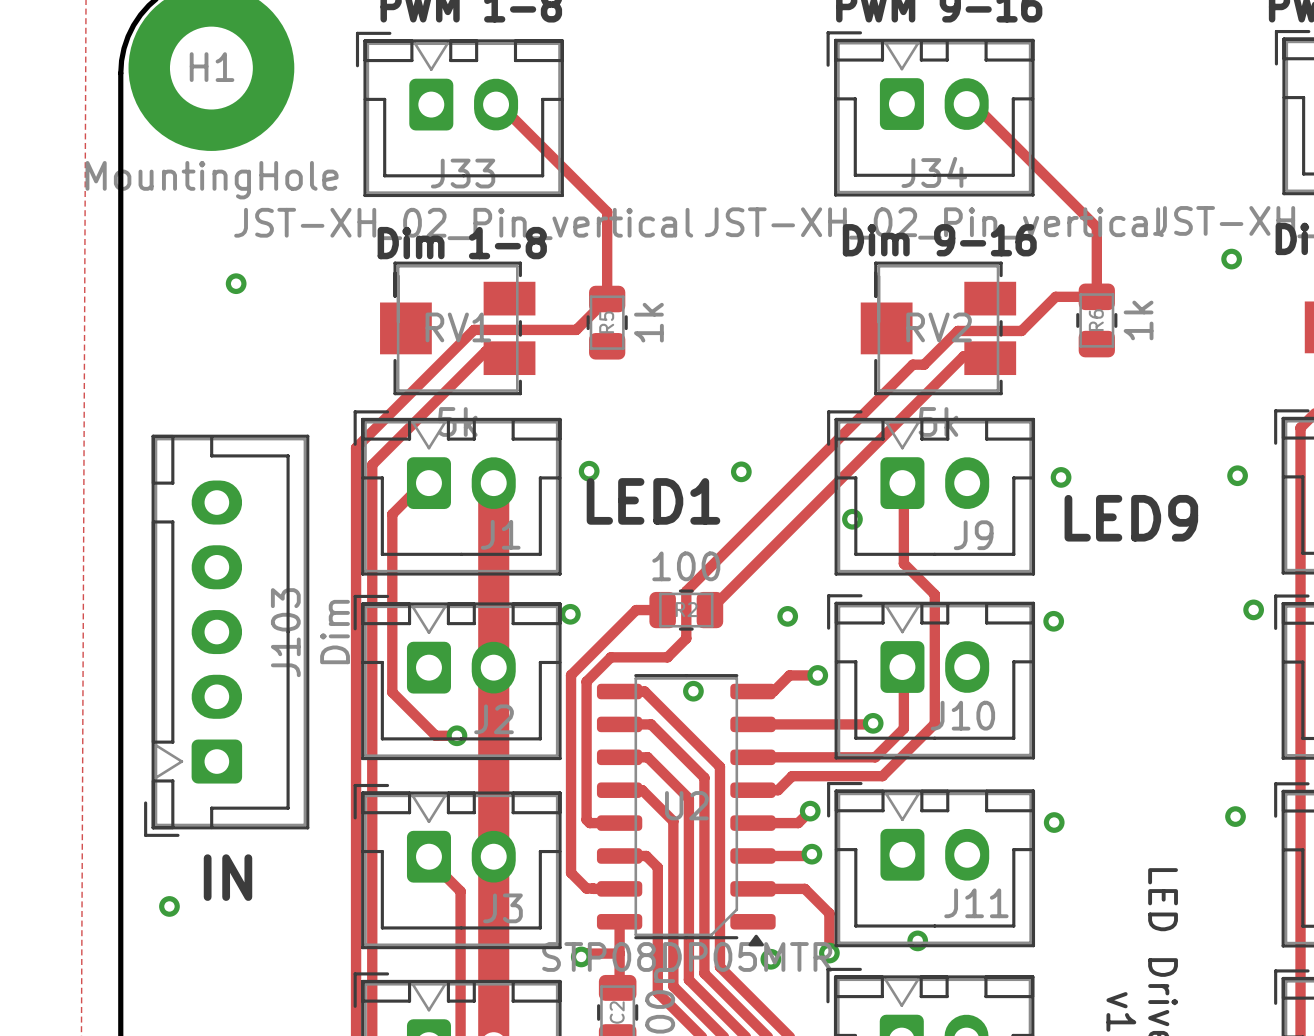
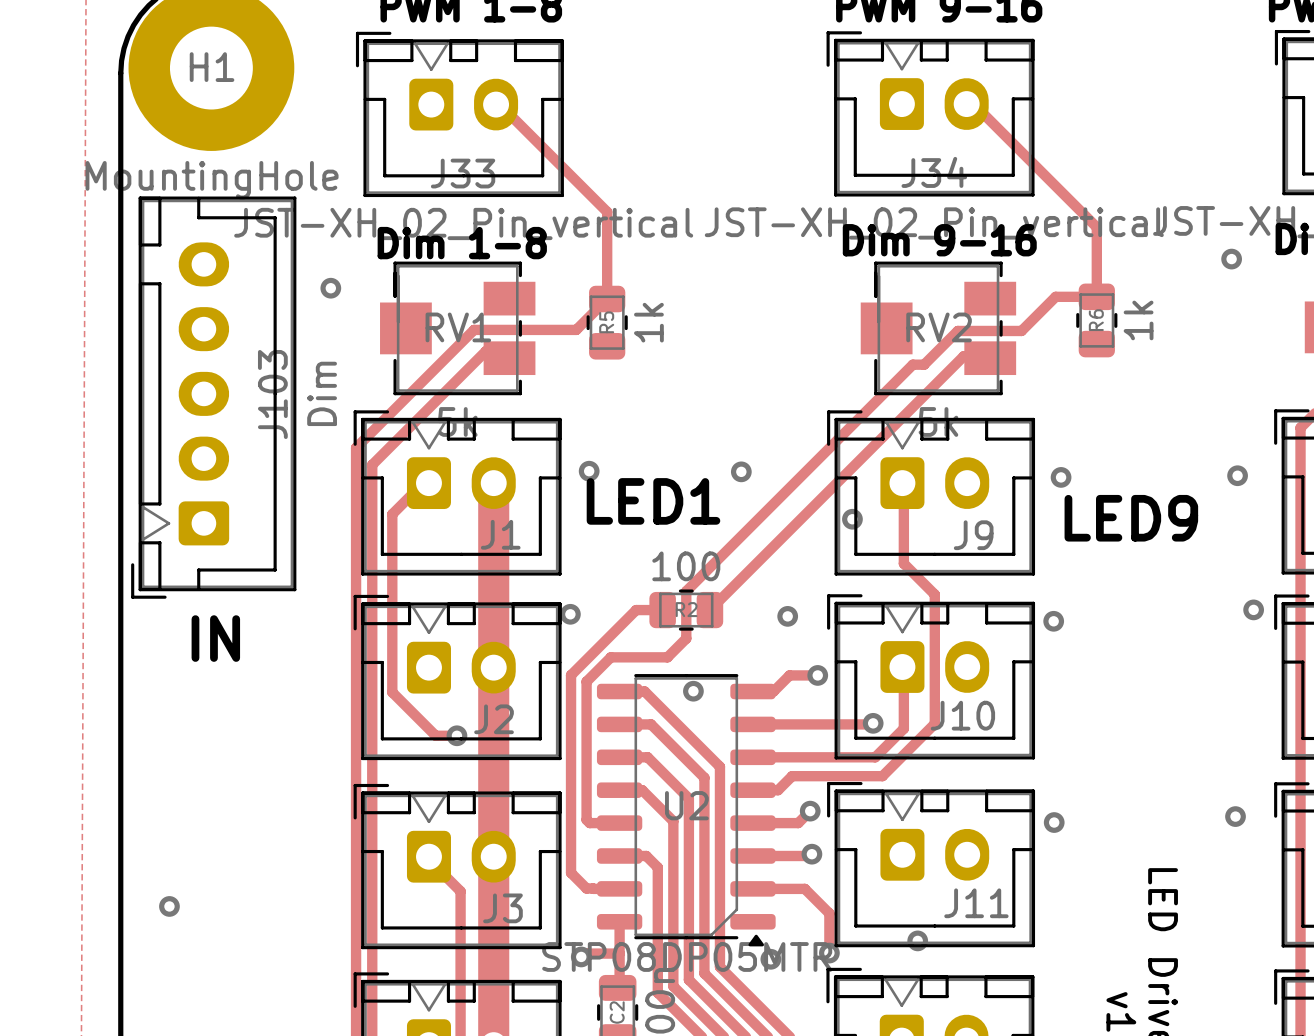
via position: (236, 283) -> (330, 288)
J103 position: (226, 635) -> (213, 397)
text position: IN (228, 877) -> IN (215, 638)

